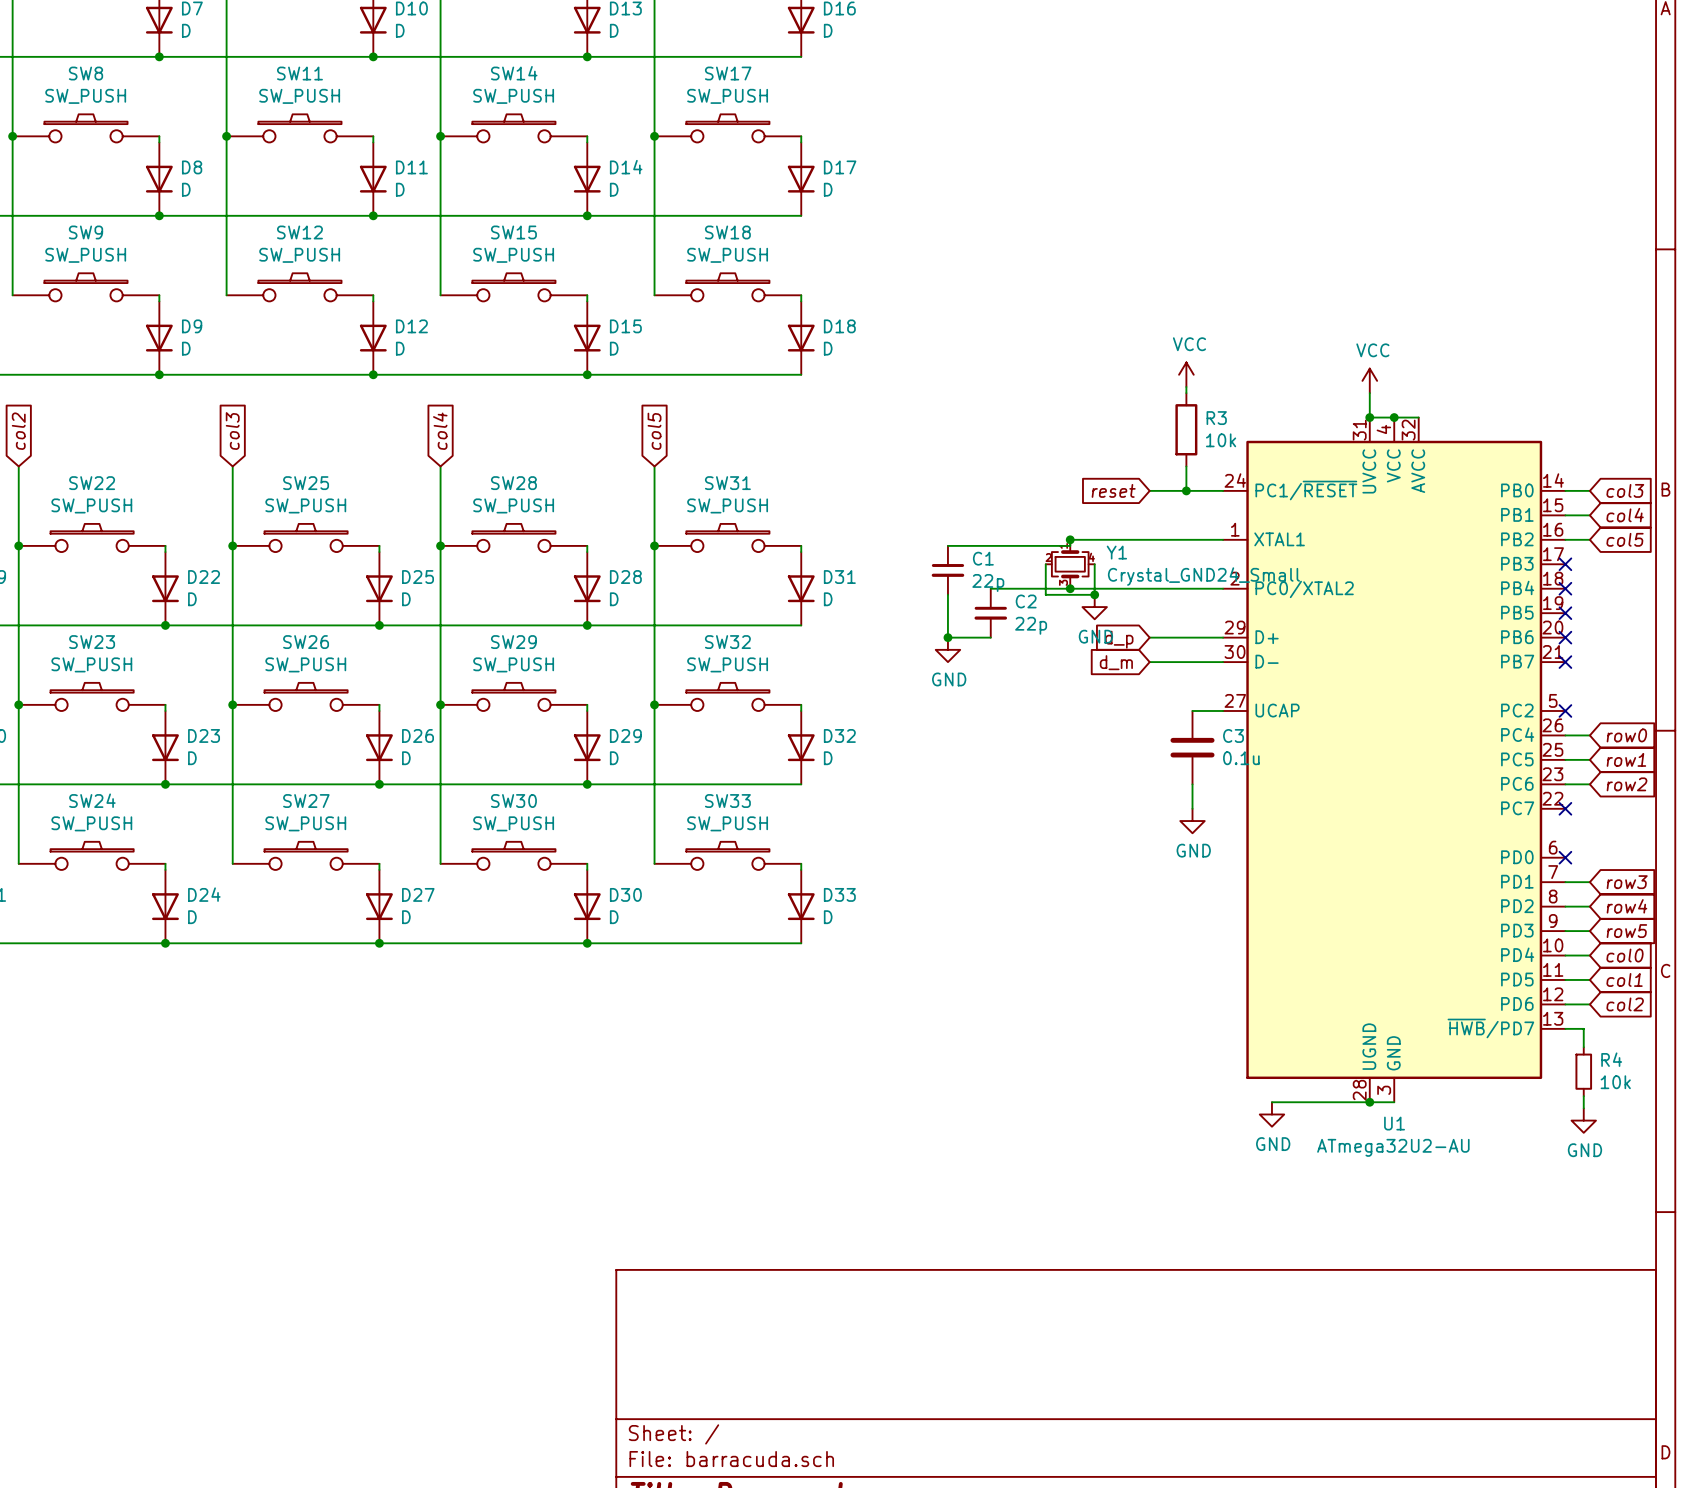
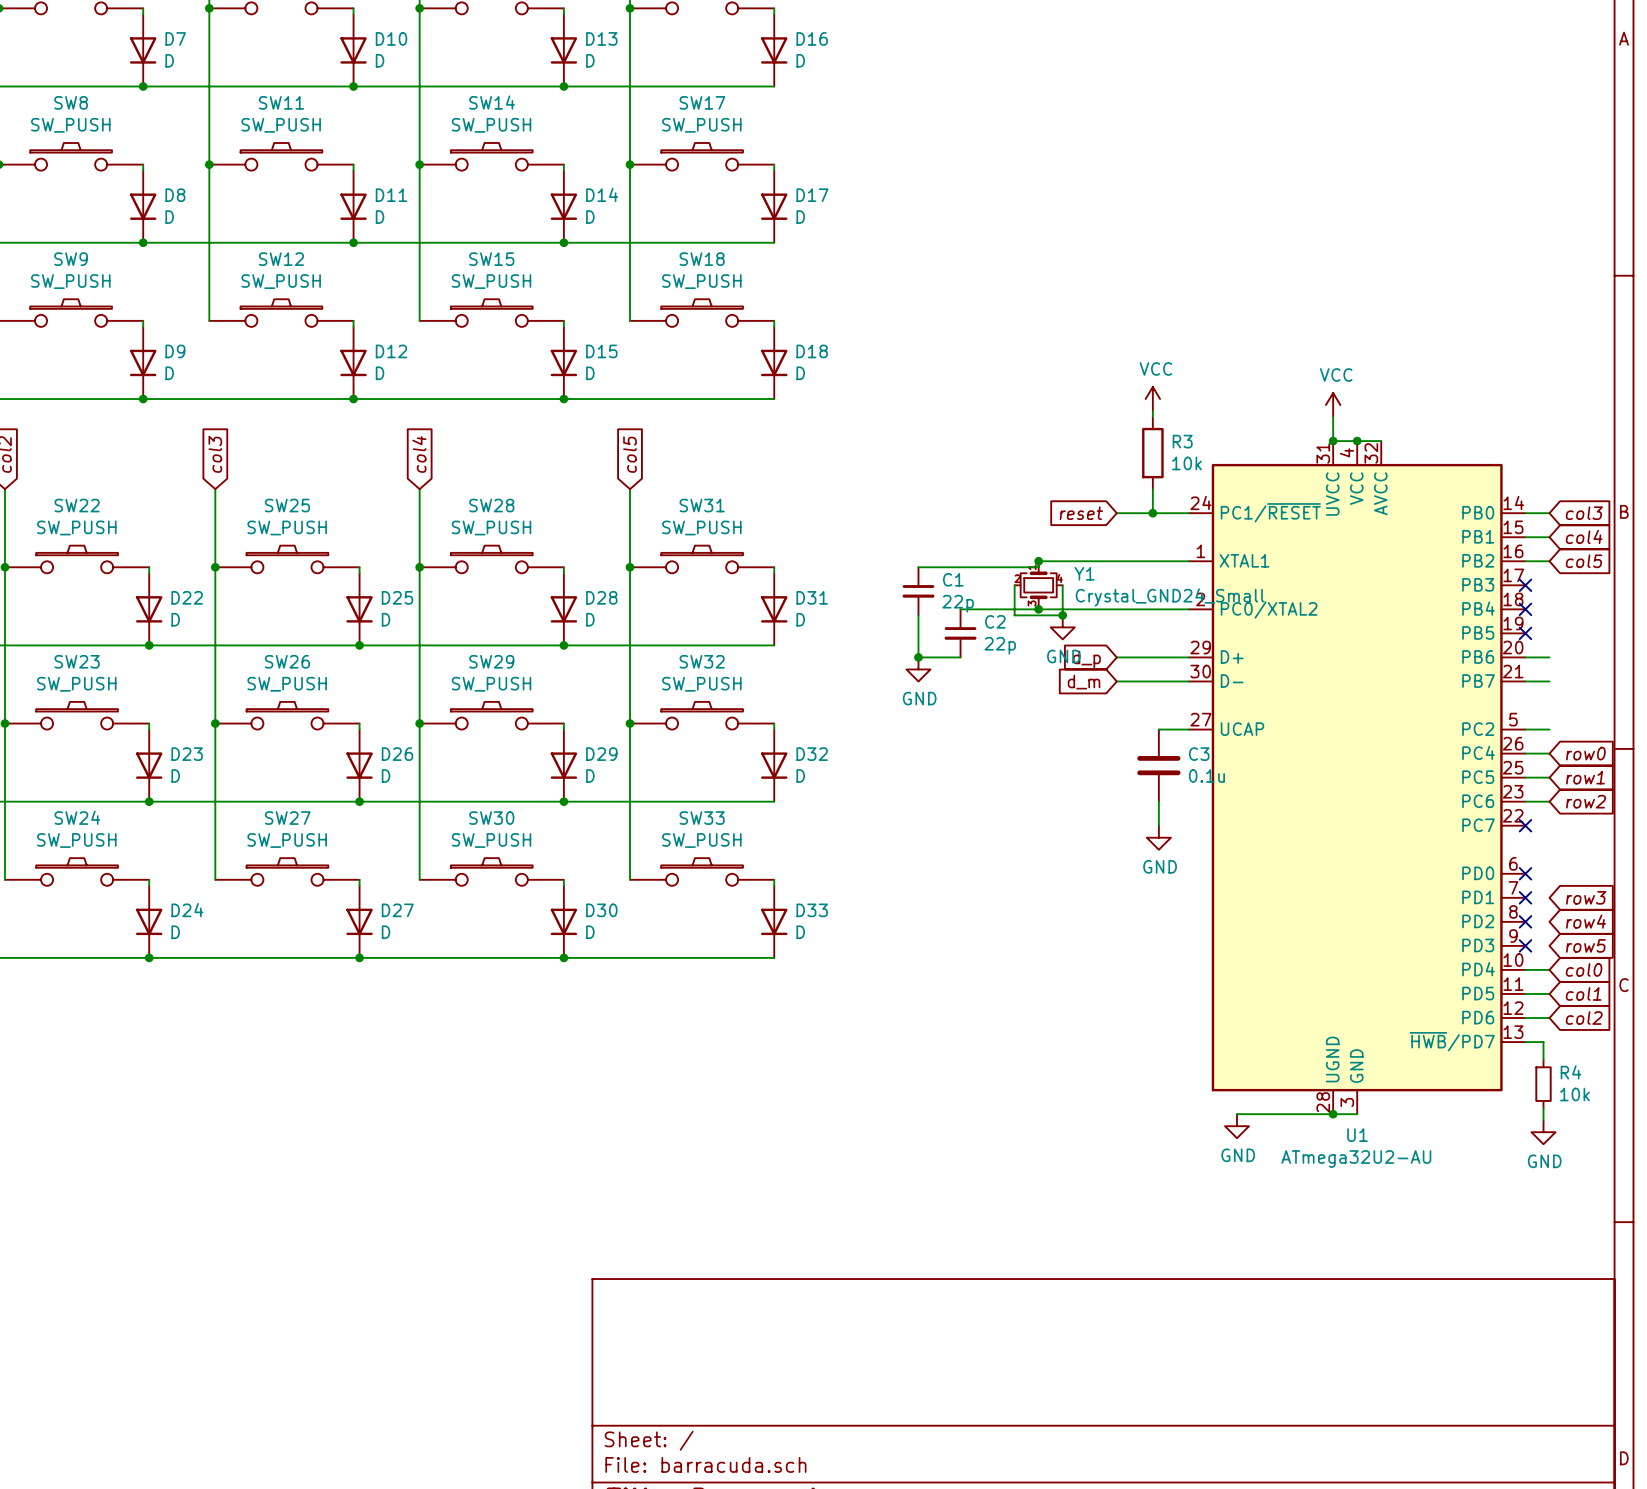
wire: none -> (1525, 657) (1549, 657)
no-connect mark: (1565, 637) -> none
no-connect mark: (1565, 662) -> none
no-connect mark: (1565, 710) -> none
wire: (1565, 882) (1589, 882) -> (1525, 681) (1549, 681)
no-connect mark: none -> (1525, 897)
wire: (1565, 906) (1589, 906) -> none
no-connect mark: none -> (1525, 921)
wire: (1565, 931) (1589, 931) -> (1525, 729) (1549, 729)
no-connect mark: none -> (1525, 945)

